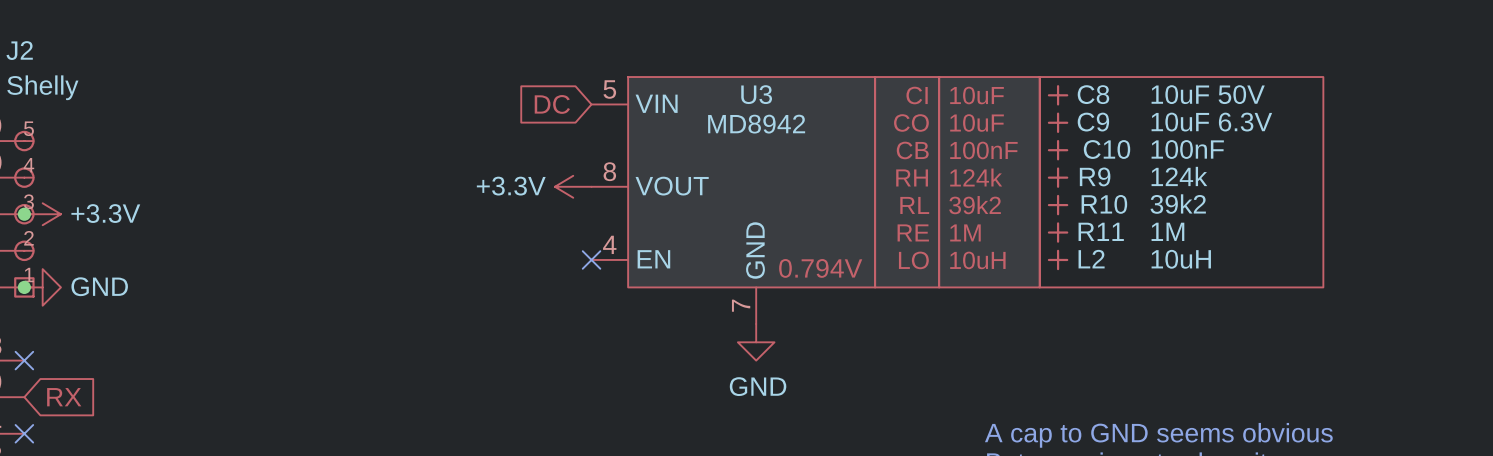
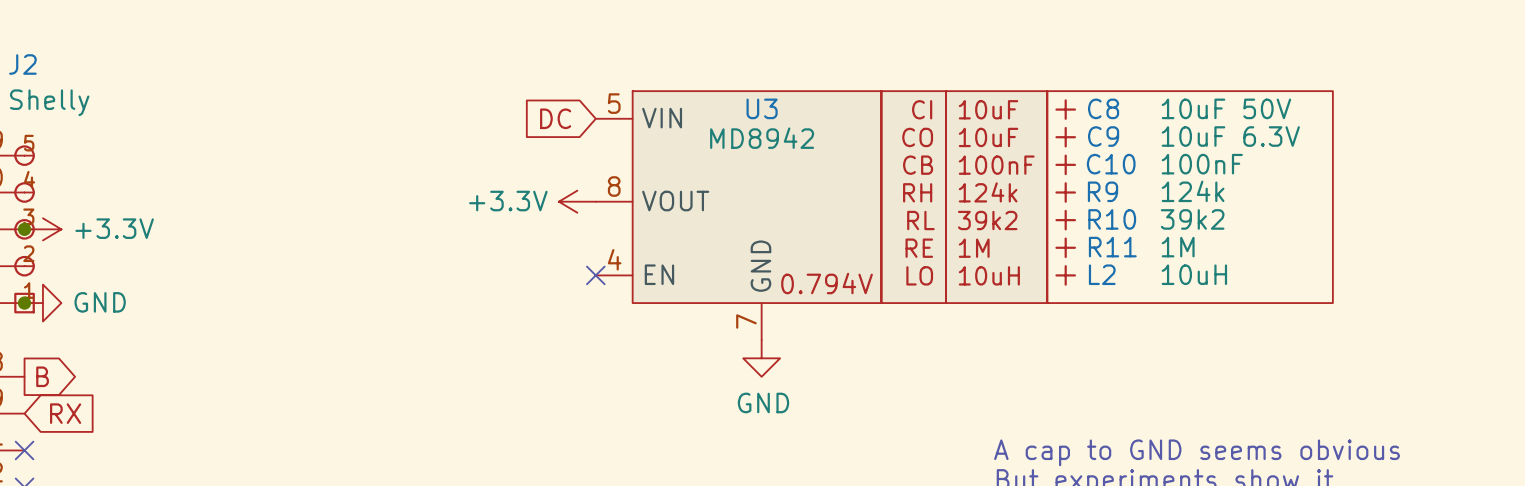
no-connect mark: (24, 360) -> none
global label: none -> B (42, 376)

